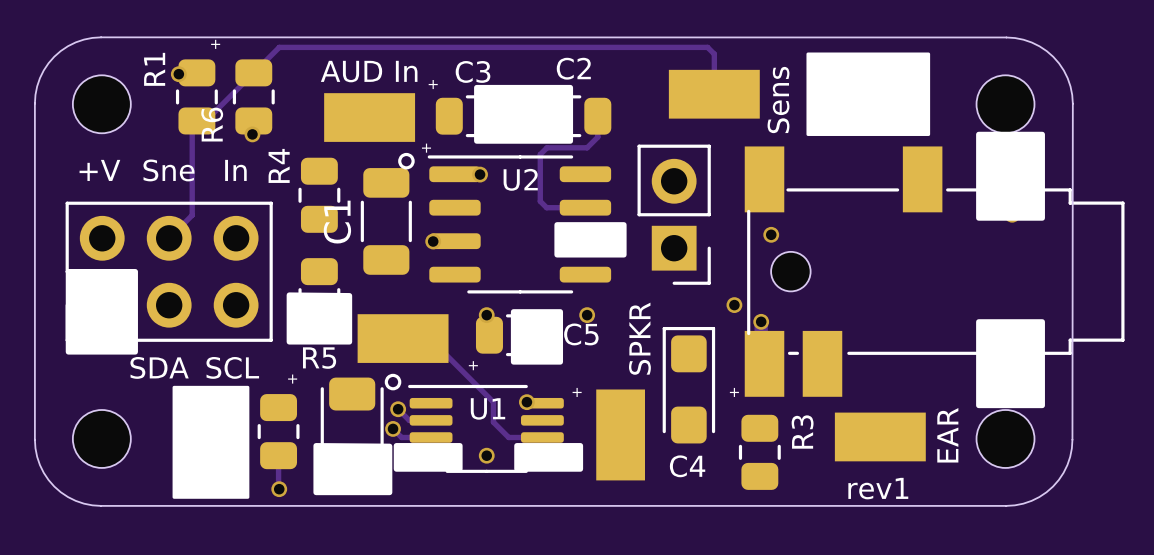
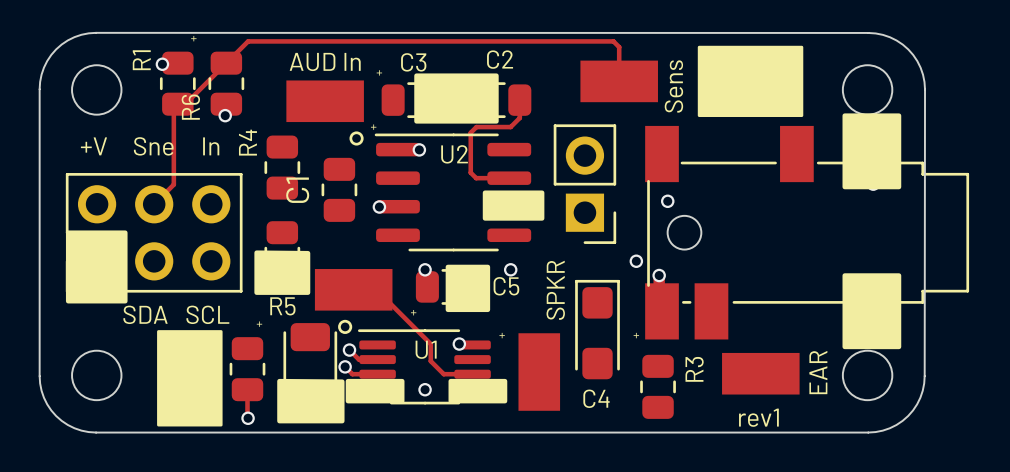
C1 footprint: [360, 168, 412, 275] -> [321, 157, 358, 222]

